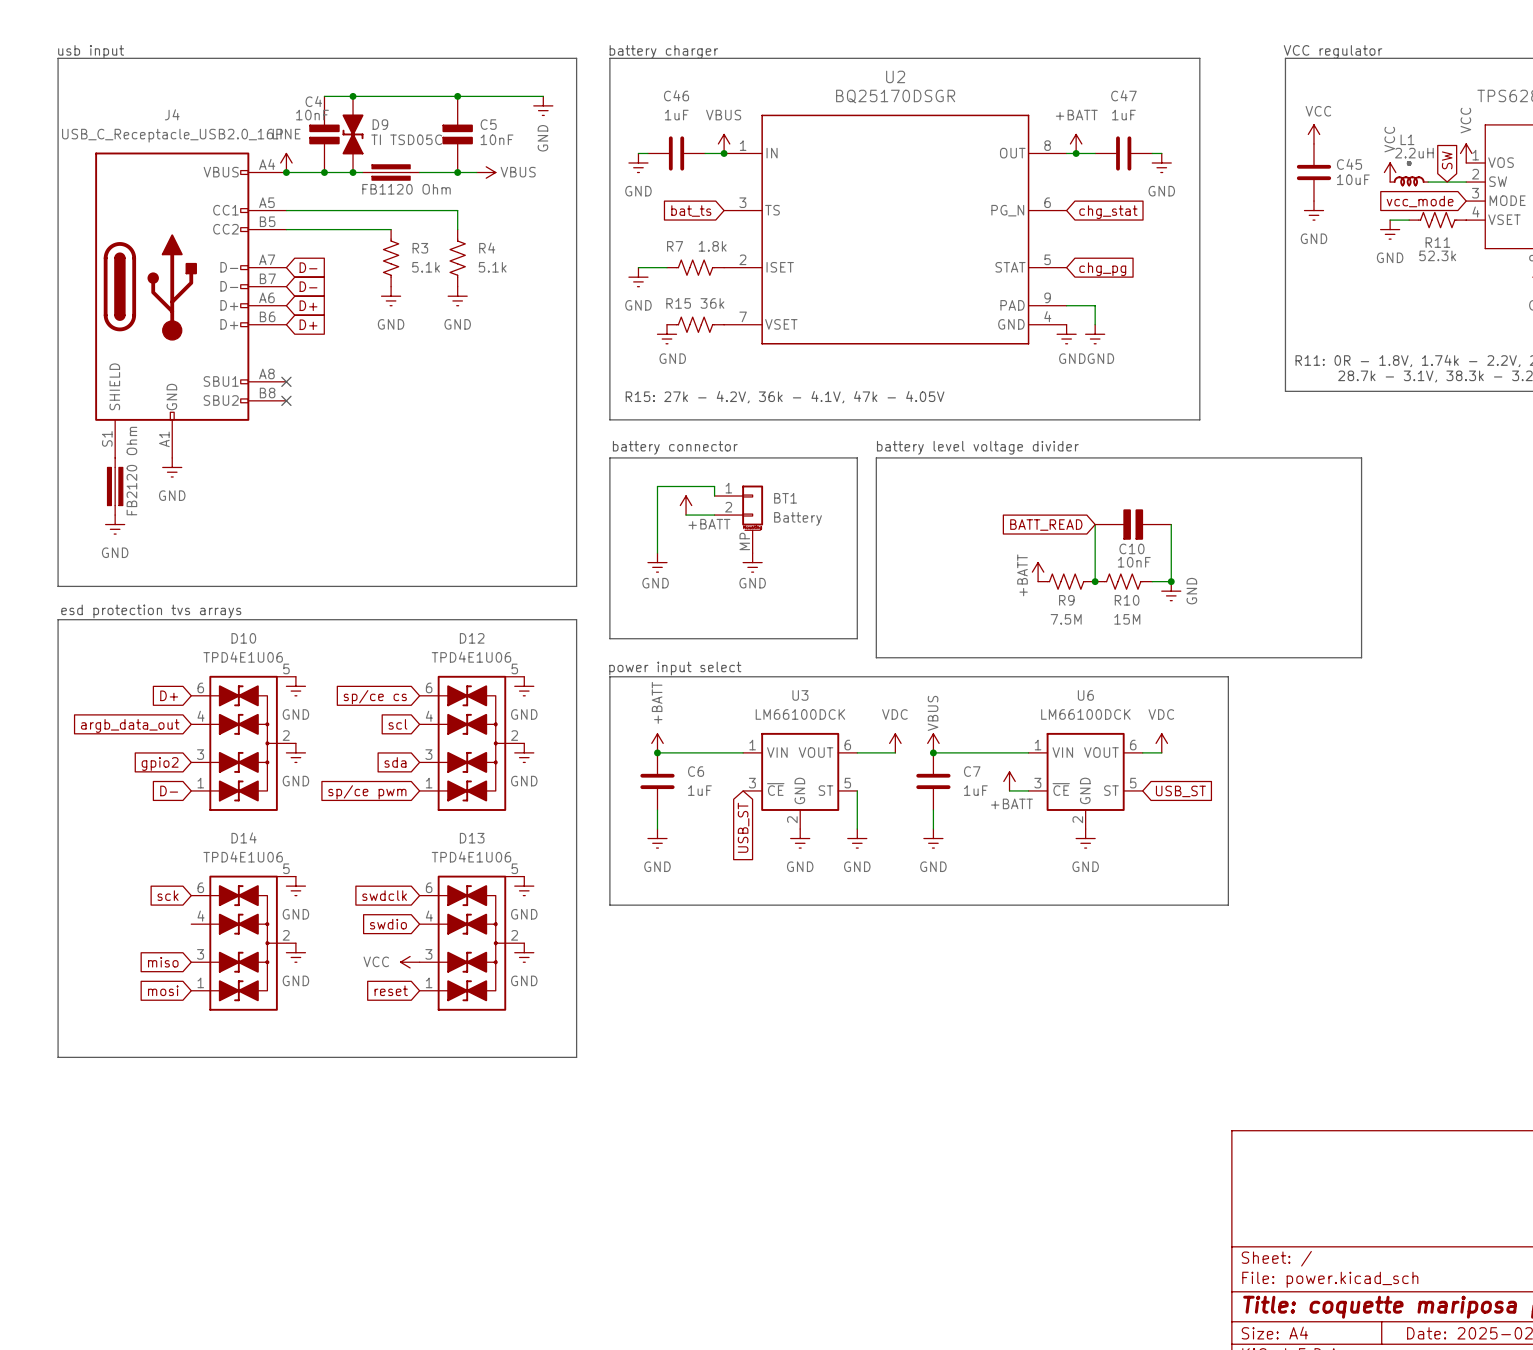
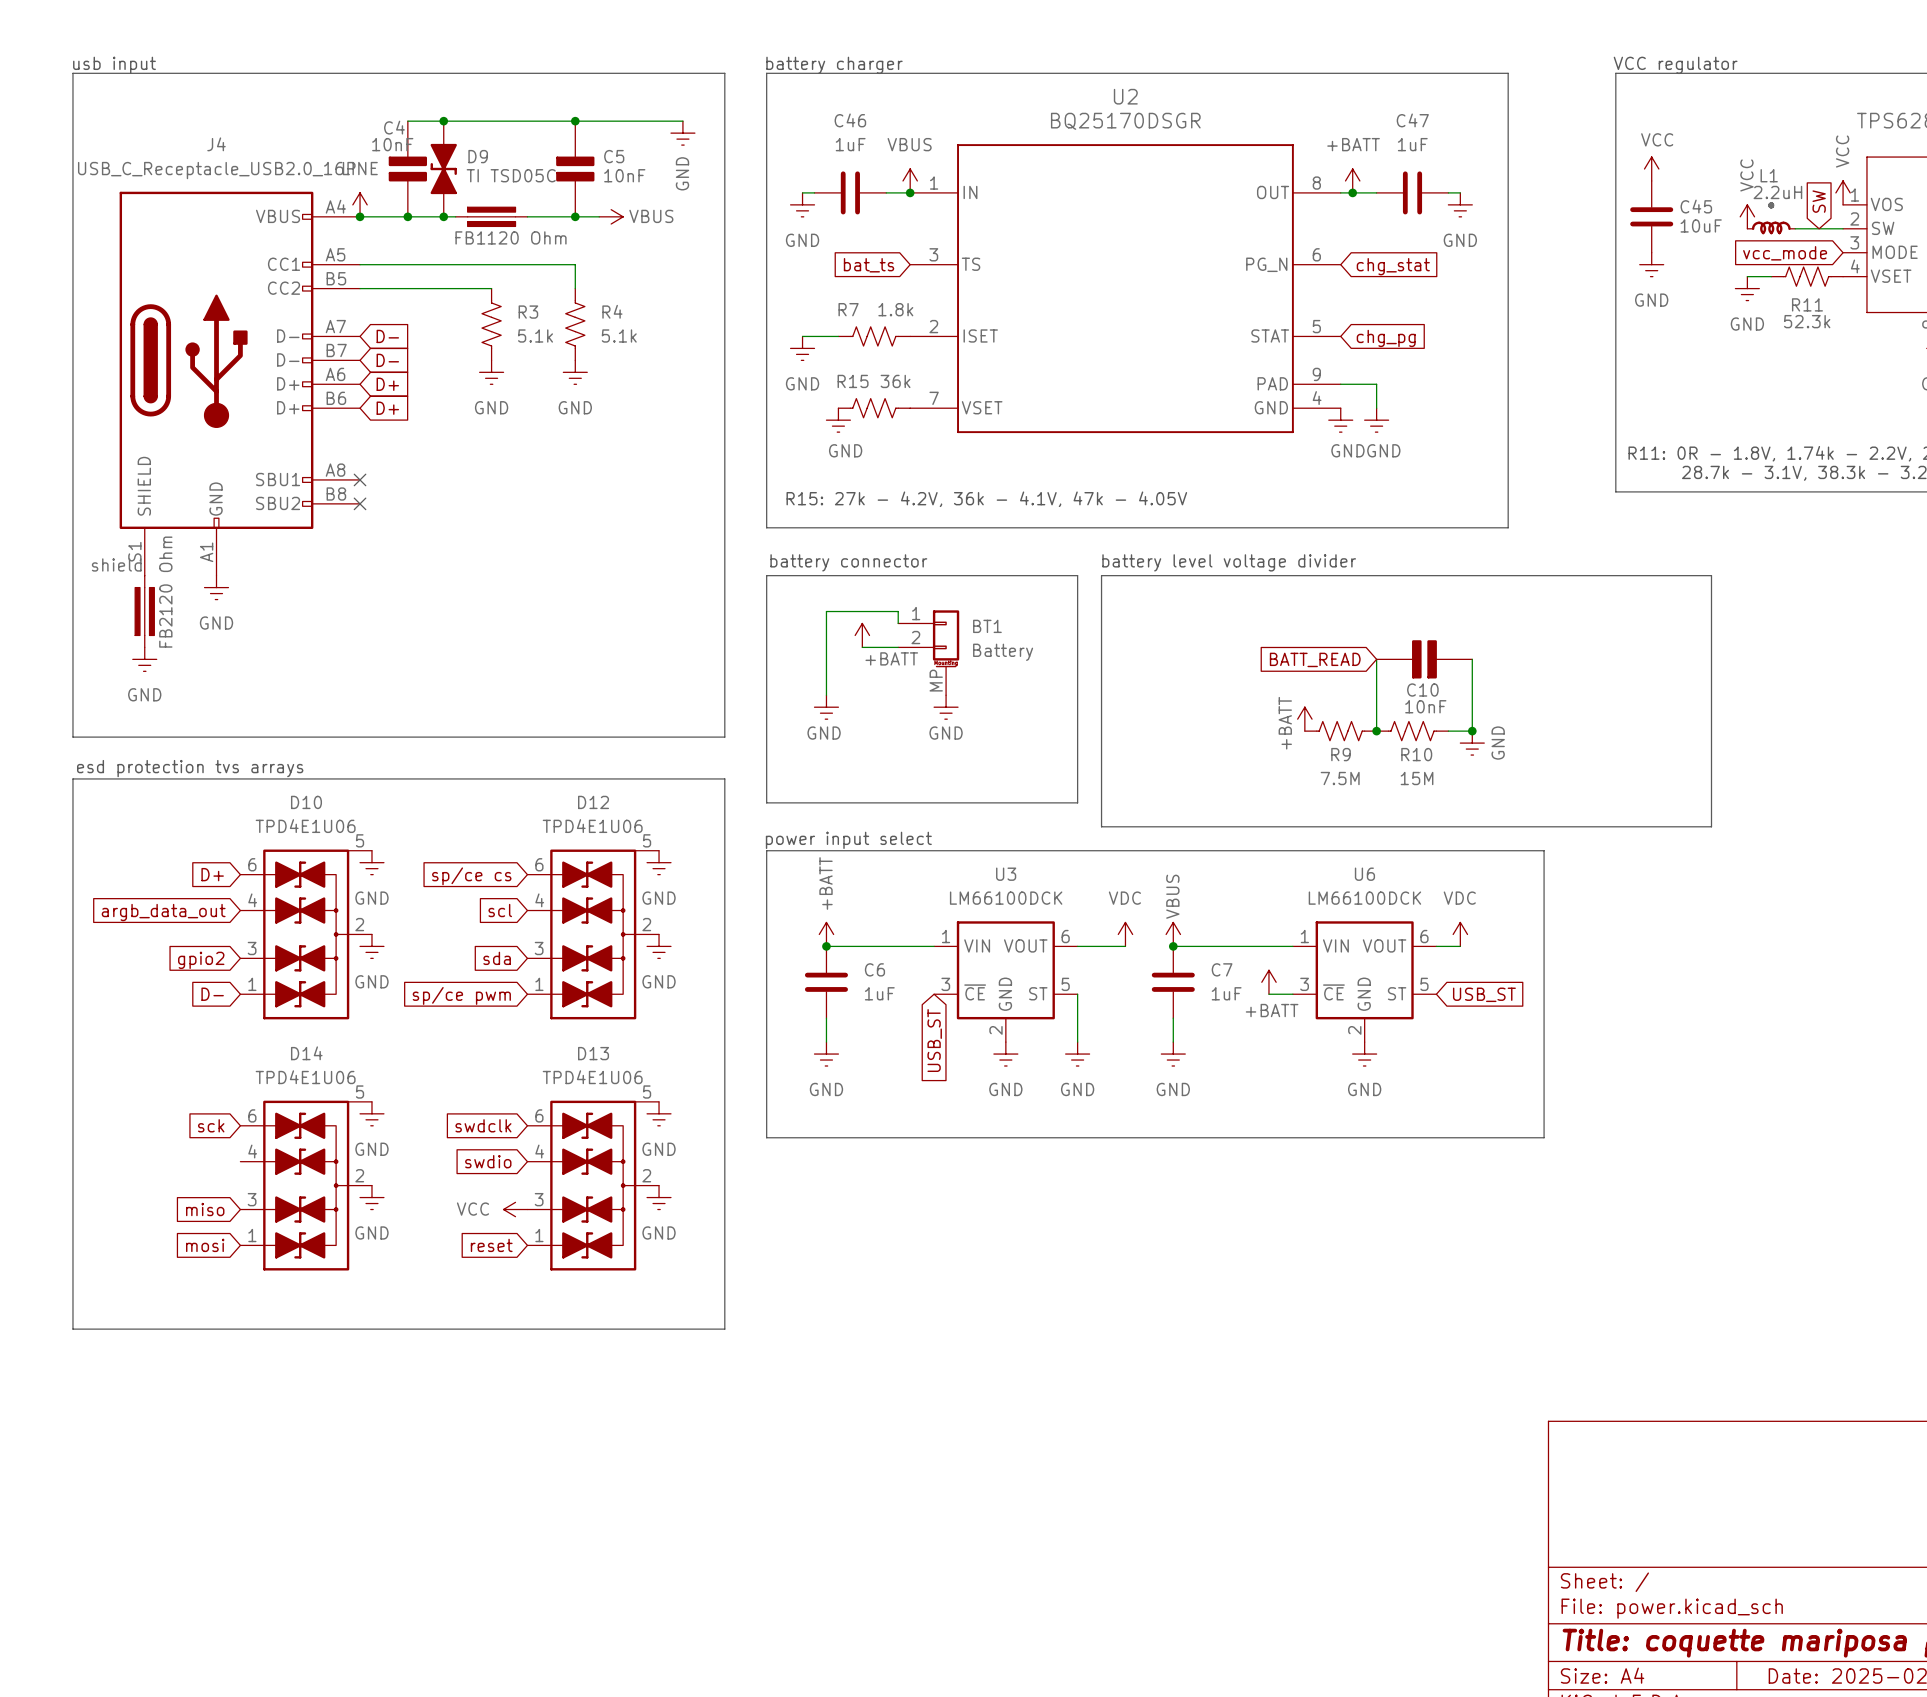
label: none -> shield (116, 564)

